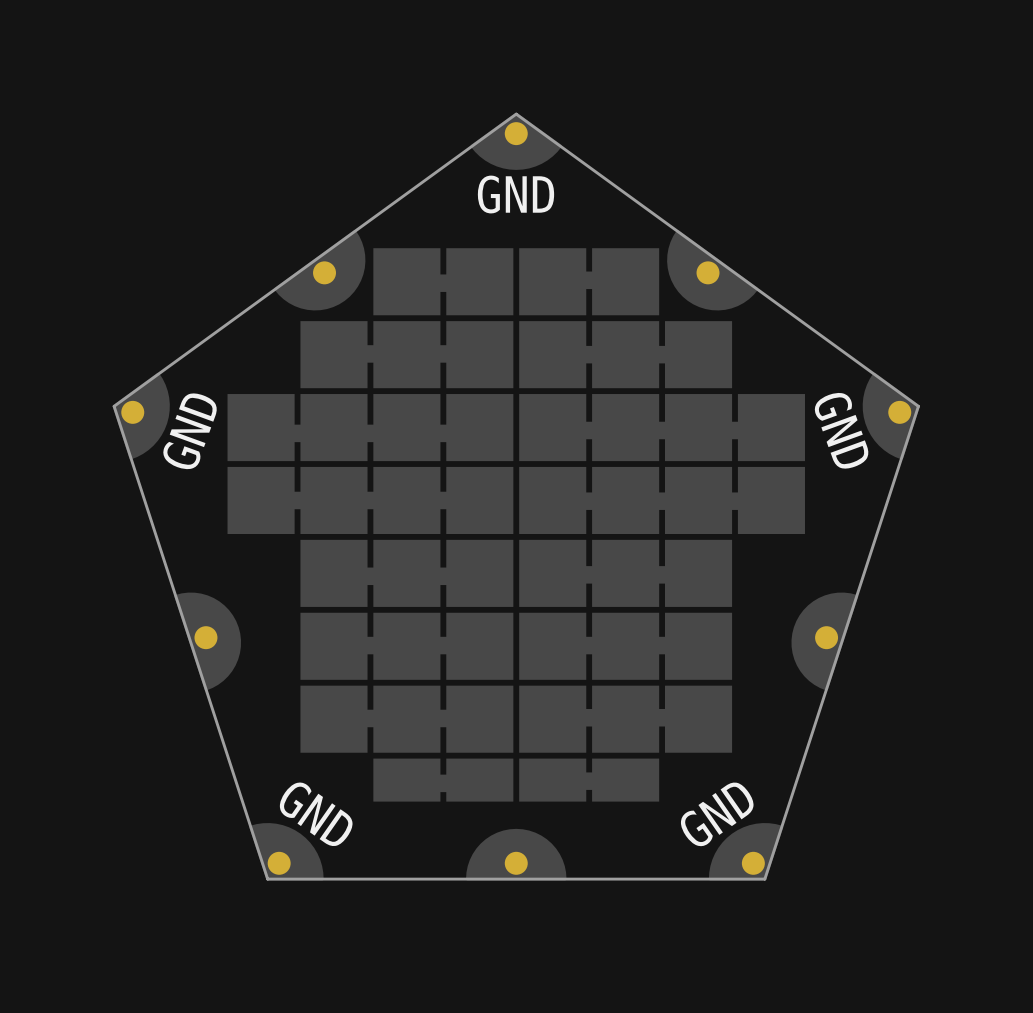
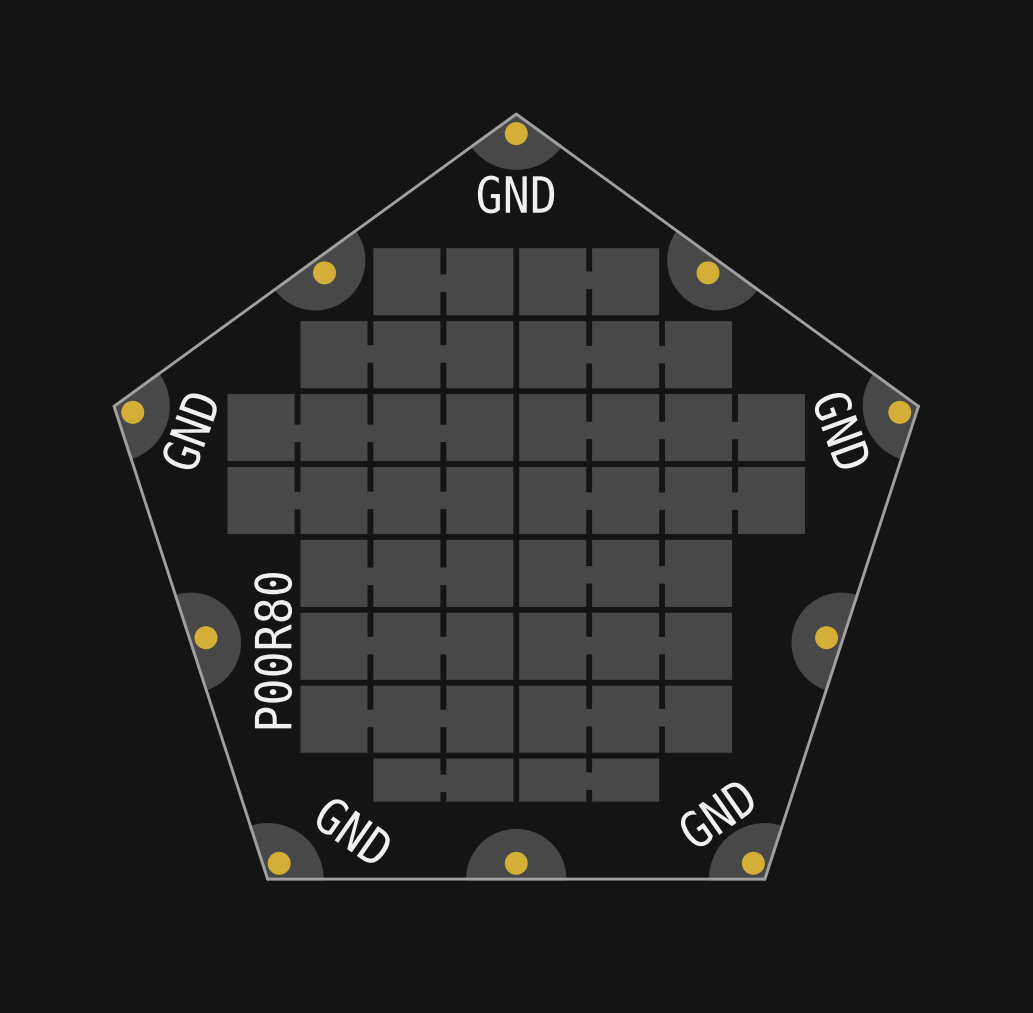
text: none -> P00R80 (273, 650)
text position: GND (316, 814) -> GND (353, 830)

